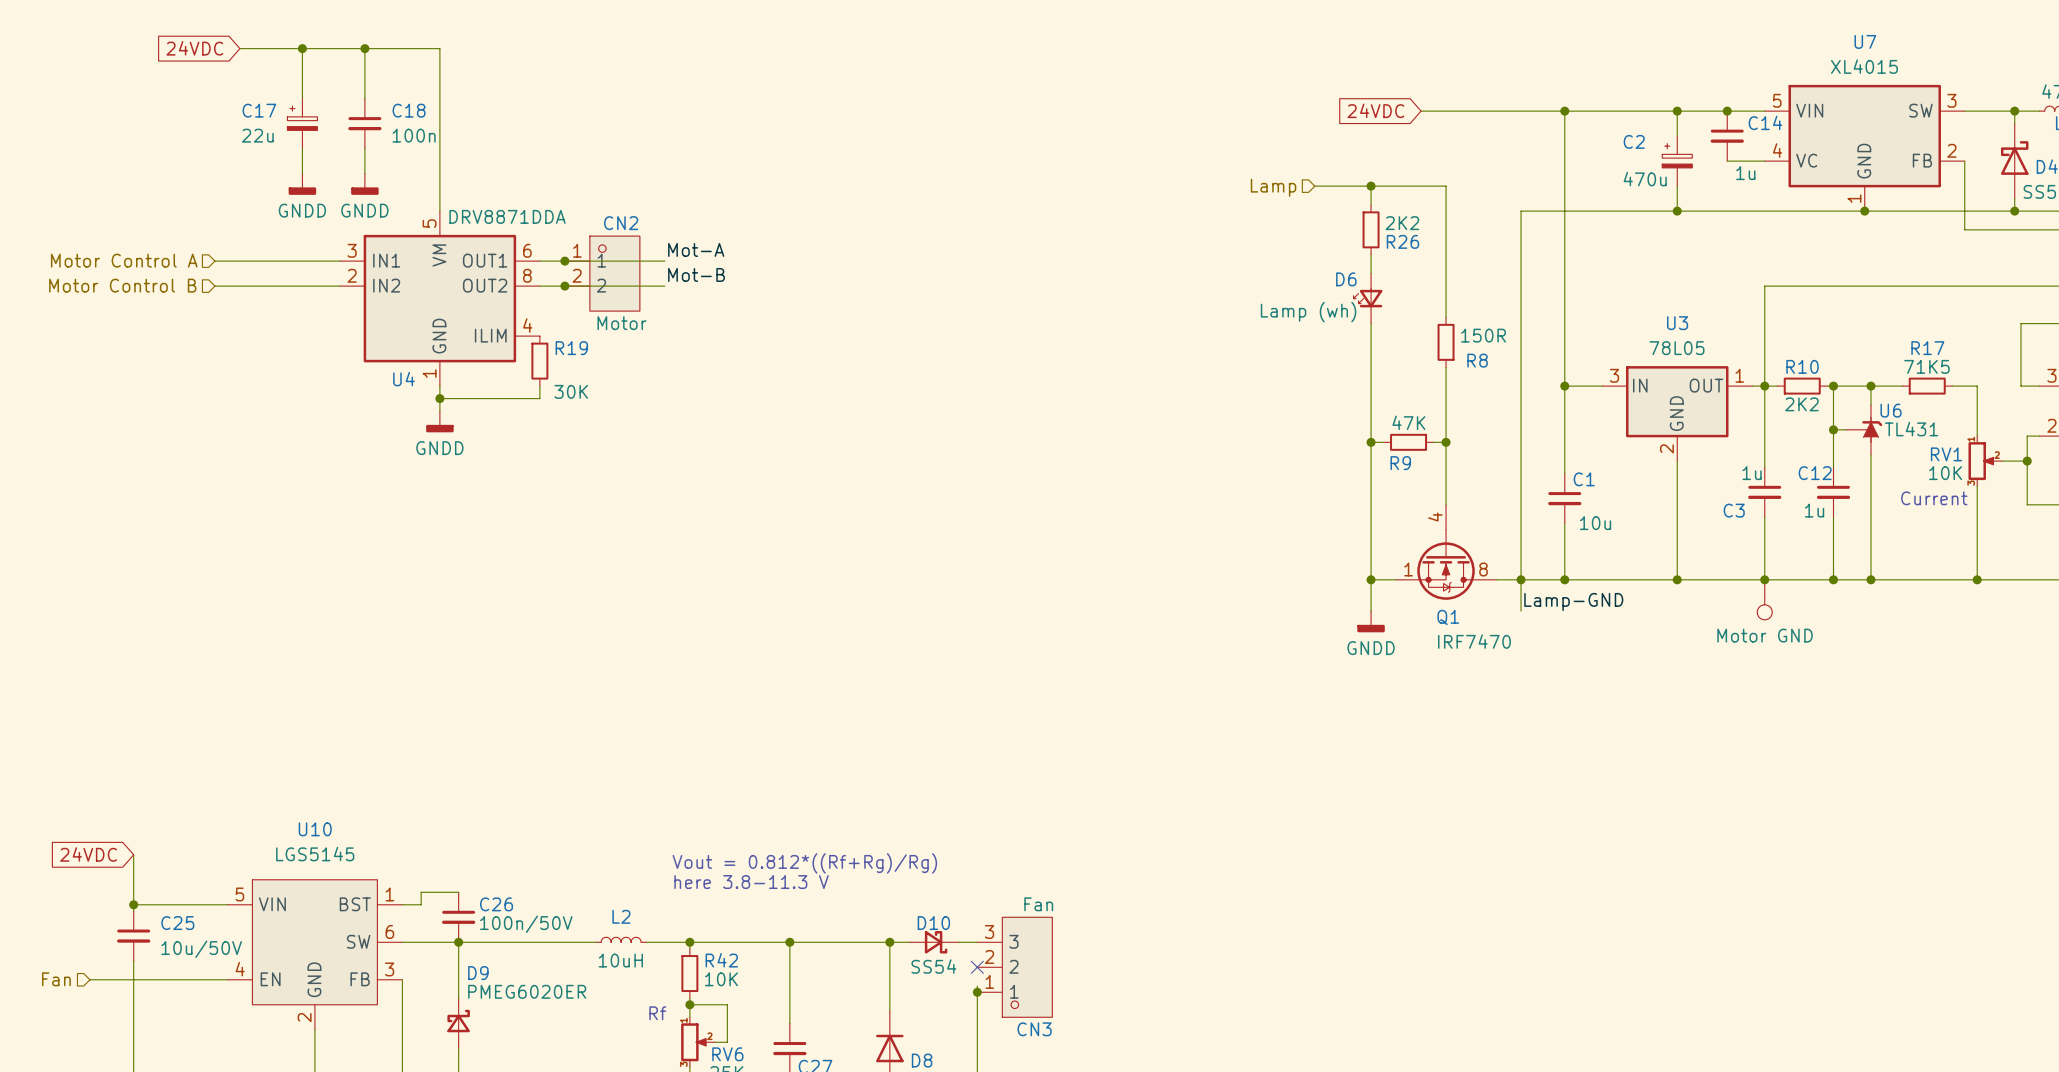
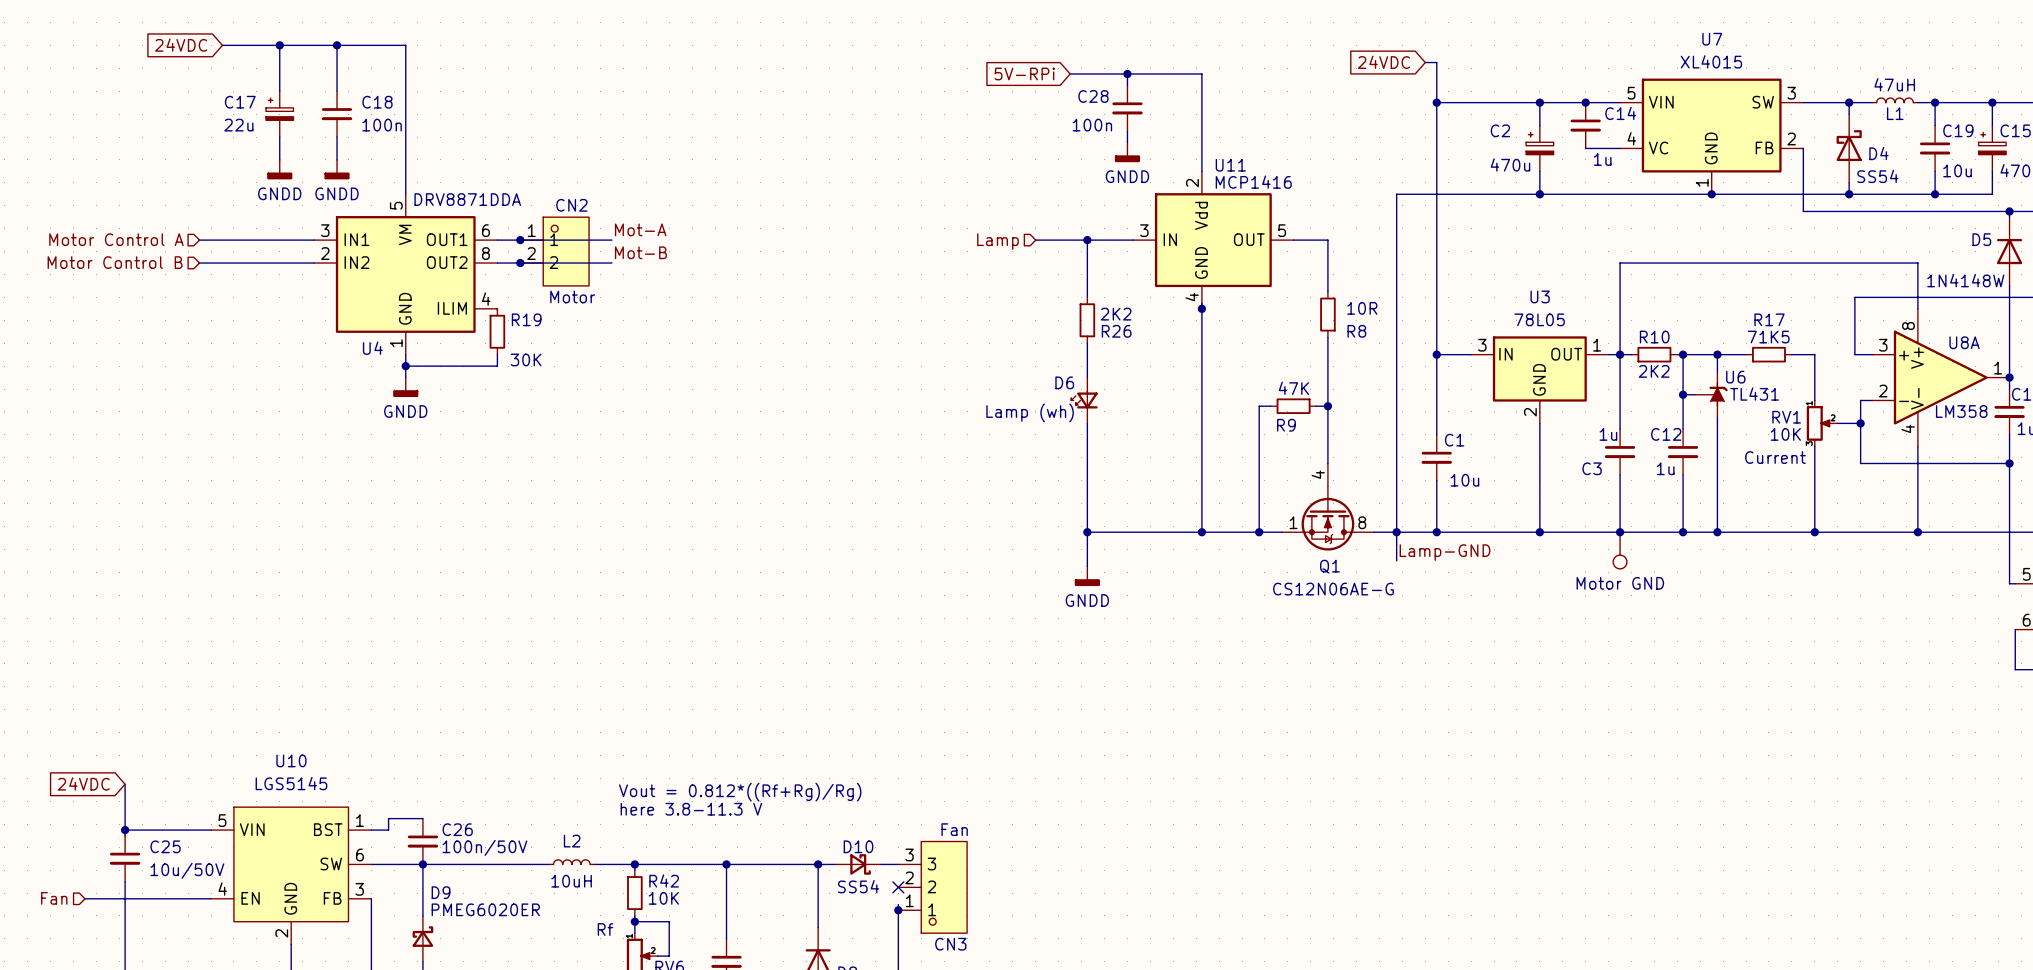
global label: none -> 5V-RPi (1024, 73)
wire: none -> (1070, 73) (1201, 73) (1201, 171)
wire: none -> (1127, 73) (1127, 85)
junction: none -> (1127, 73)
global label position: 24VDC (1375, 110) -> 24VDC (1383, 62)
wire: (1421, 111) (1564, 111) -> (1425, 62) (1436, 62) (1436, 102)
C28: none -> 100n (1127, 108)
wire: none -> (1127, 131) (1127, 142)
power symbol: none -> GNDD (1127, 152)
wire: (1314, 186) (1446, 186) (1446, 261) -> (1293, 240) (1327, 240)
wire: (1371, 186) (1371, 204) -> none
junction: (1371, 186) -> none
hierarchical label position: Lamp (1273, 187) -> Lamp (997, 241)
R26 position: (1371, 229) -> (1087, 320)
wire: none -> (1035, 240) (1133, 240)
wire: none -> (1087, 240) (1087, 297)
junction: none -> (1087, 240)
U11: none -> MCP1416 (1213, 240)
D6 position: (1367, 298) -> (1084, 400)
wire: (1371, 323) (1371, 442) -> none
wire: none -> (1201, 303) (1201, 532)
R8 value: 150R (1483, 335) -> 10R (1362, 308)
junction: none -> (1201, 308)
wire: none -> (1087, 343) (1087, 377)
junction: (1371, 442) -> none
wire: none -> (1087, 423) (1087, 566)
junction: none -> (1087, 532)
junction: none -> (1201, 532)
wire: (1371, 579) (1371, 611) -> (1259, 532) (1087, 532)
power symbol position: GNDD (1371, 621) -> GNDD (1087, 576)
Q1 value: IRF7470 (1474, 641) -> CS12N06AE-G (1333, 589)

